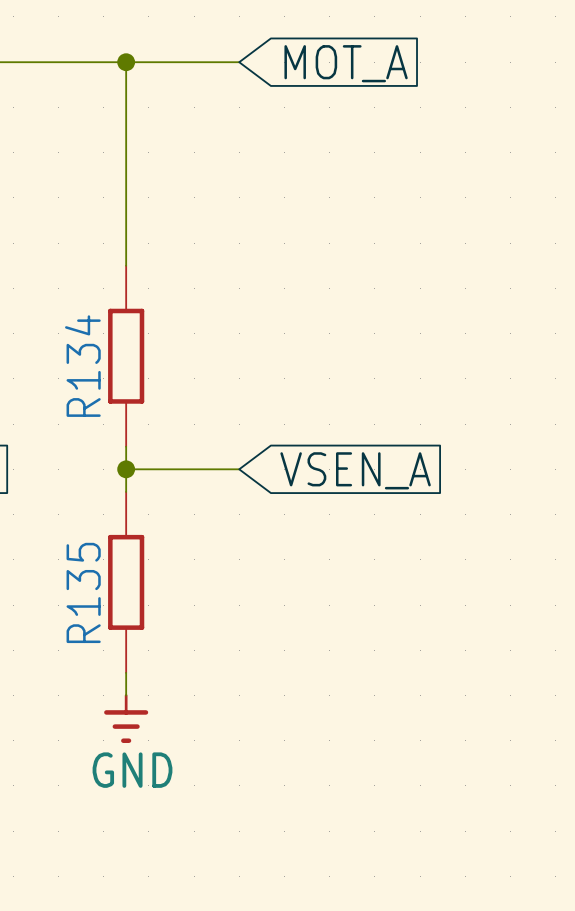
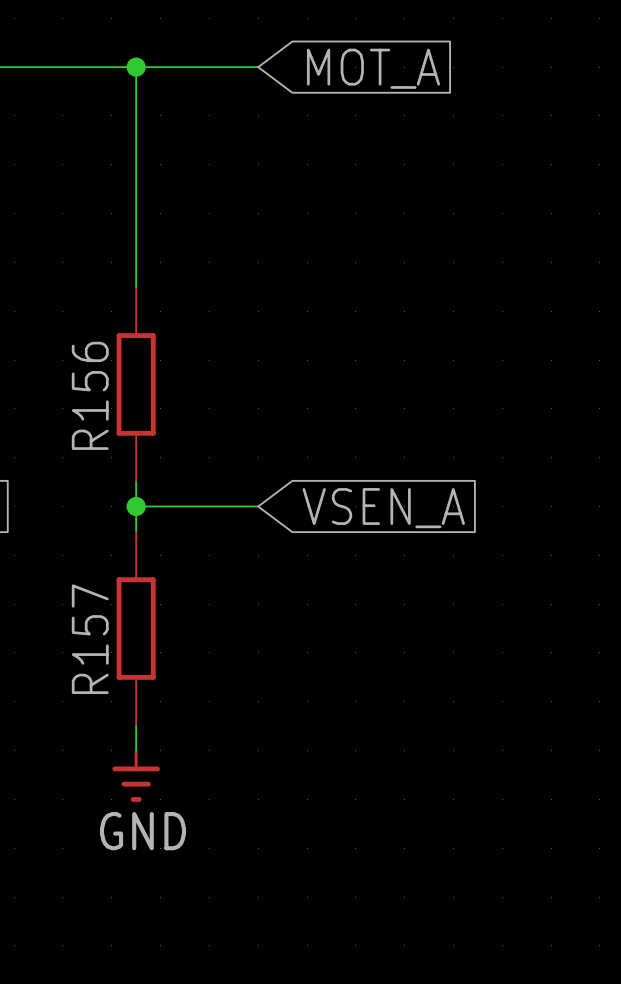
R134 name: R134 (82, 366) -> R156 (90, 395)
R135 name: R135 (83, 592) -> R157 (90, 639)

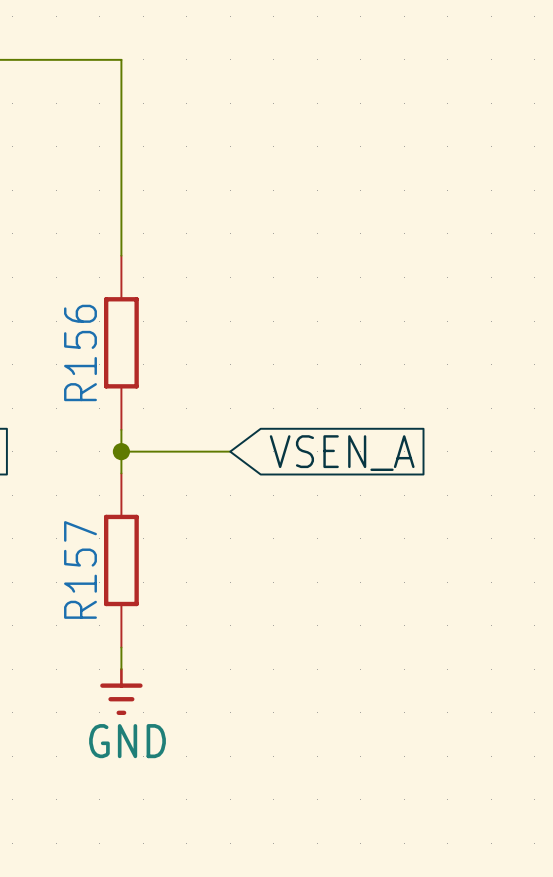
wire: (136, 67) (258, 67) -> none
junction: (136, 67) -> none
global label: MOT_A (373, 68) -> none

